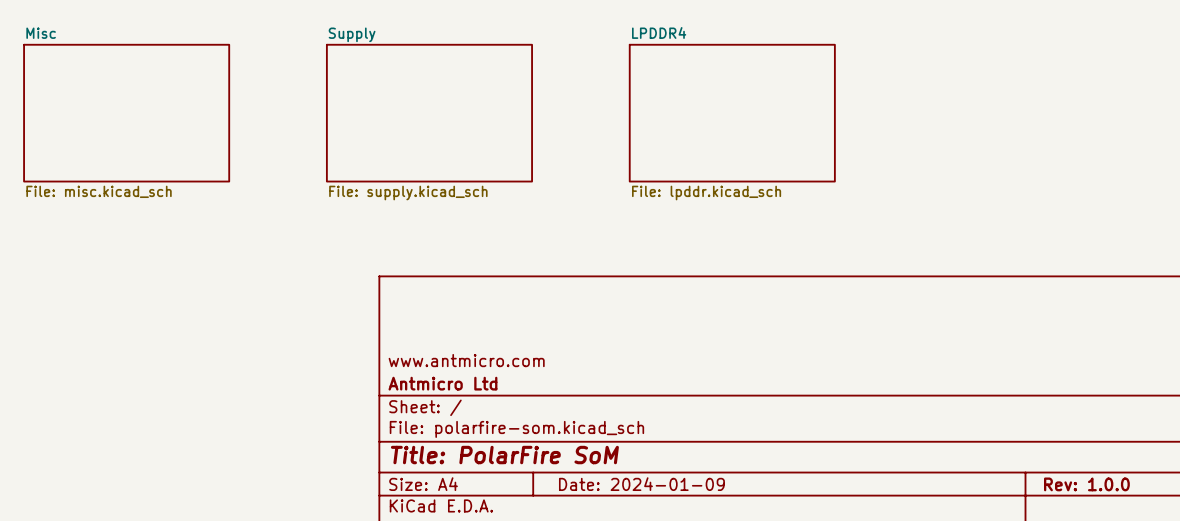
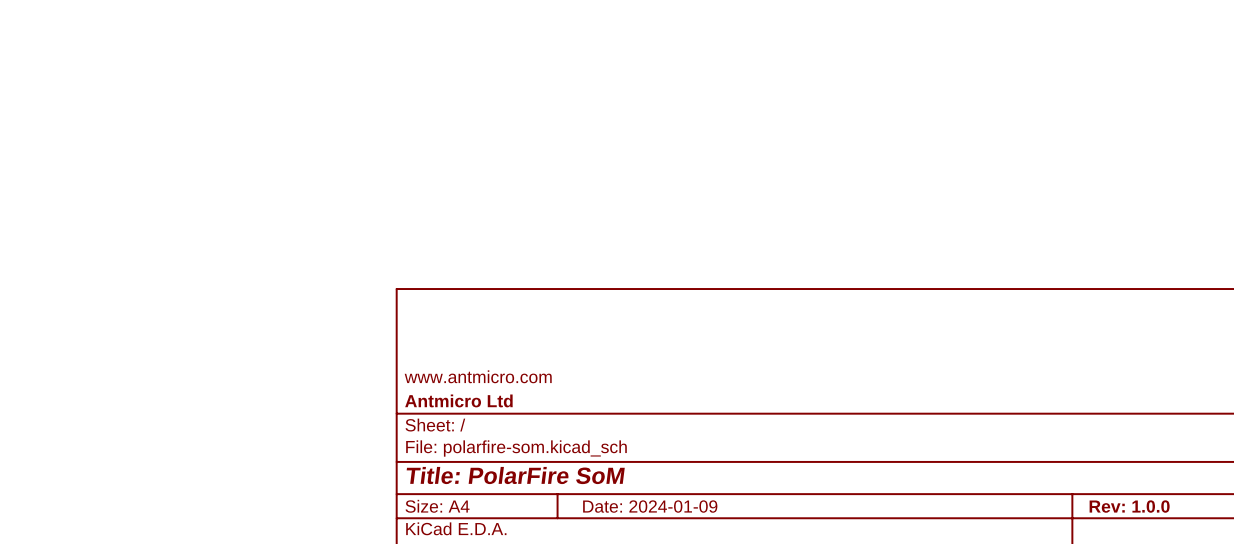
sheet Misc: File: misc.kicad_sch (126, 113) -> none
sheet Supply: File: supply.kicad_sch (429, 113) -> none
sheet LPDDR4: File: lpddr.kicad_sch (732, 113) -> none

